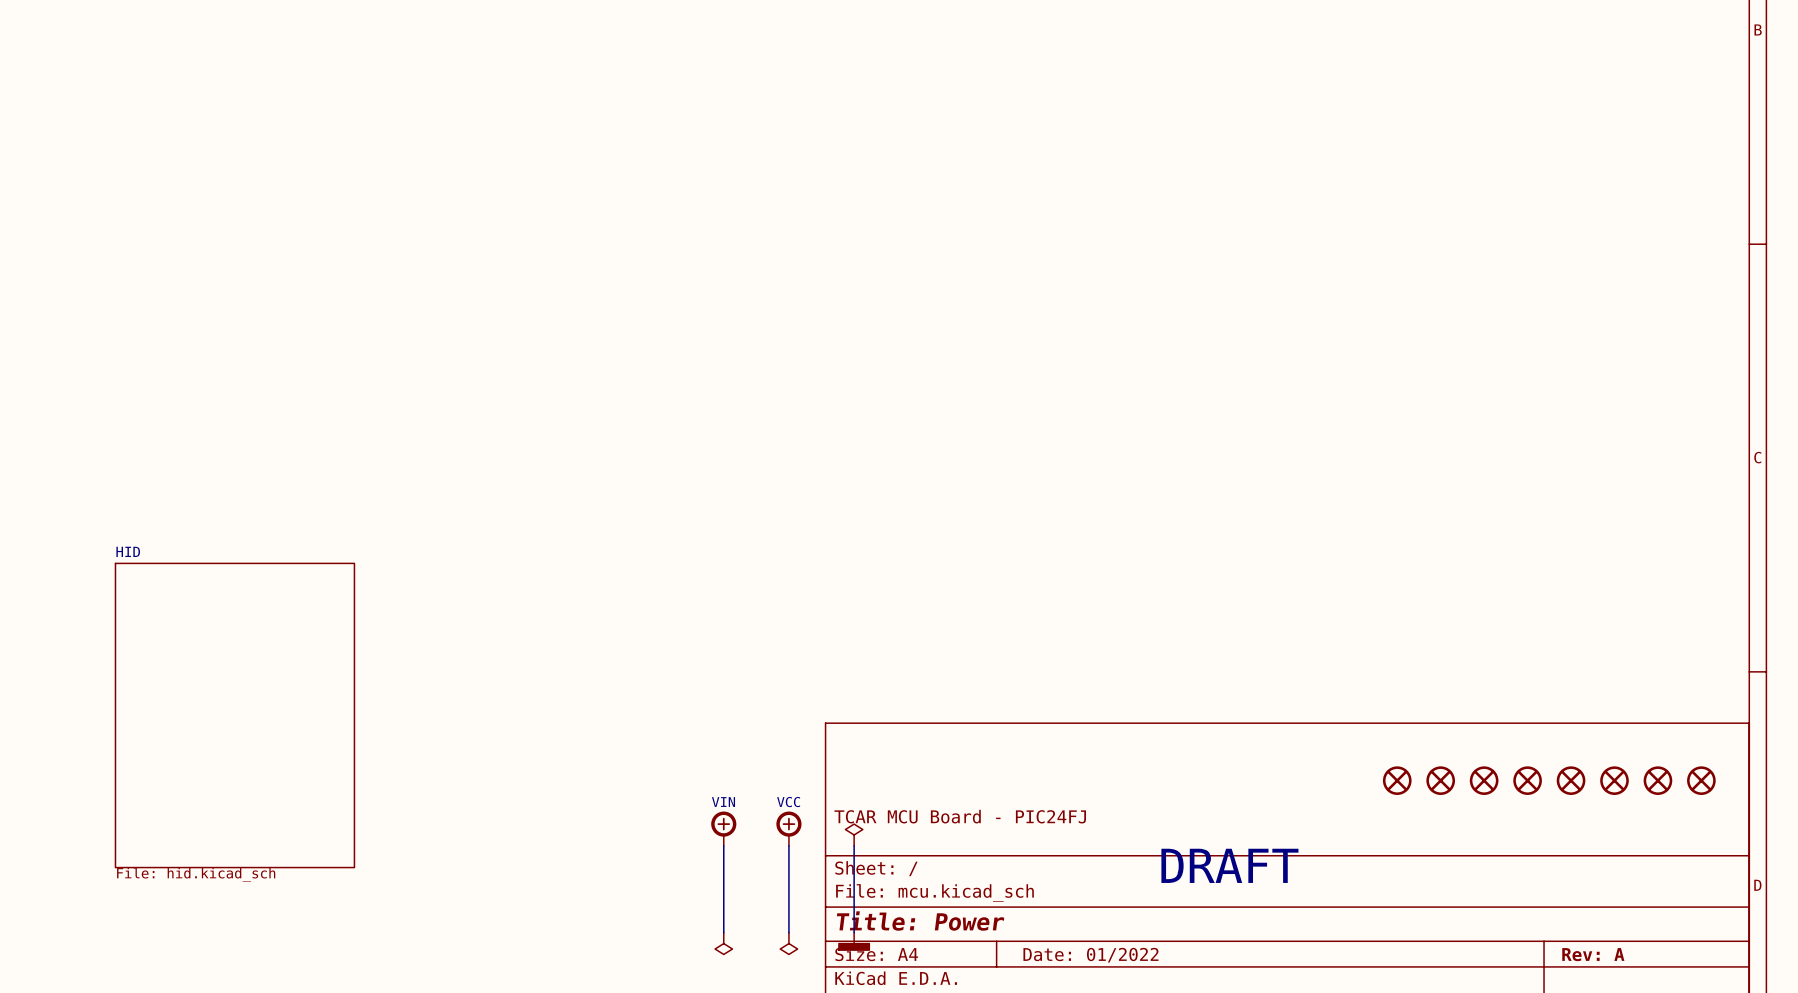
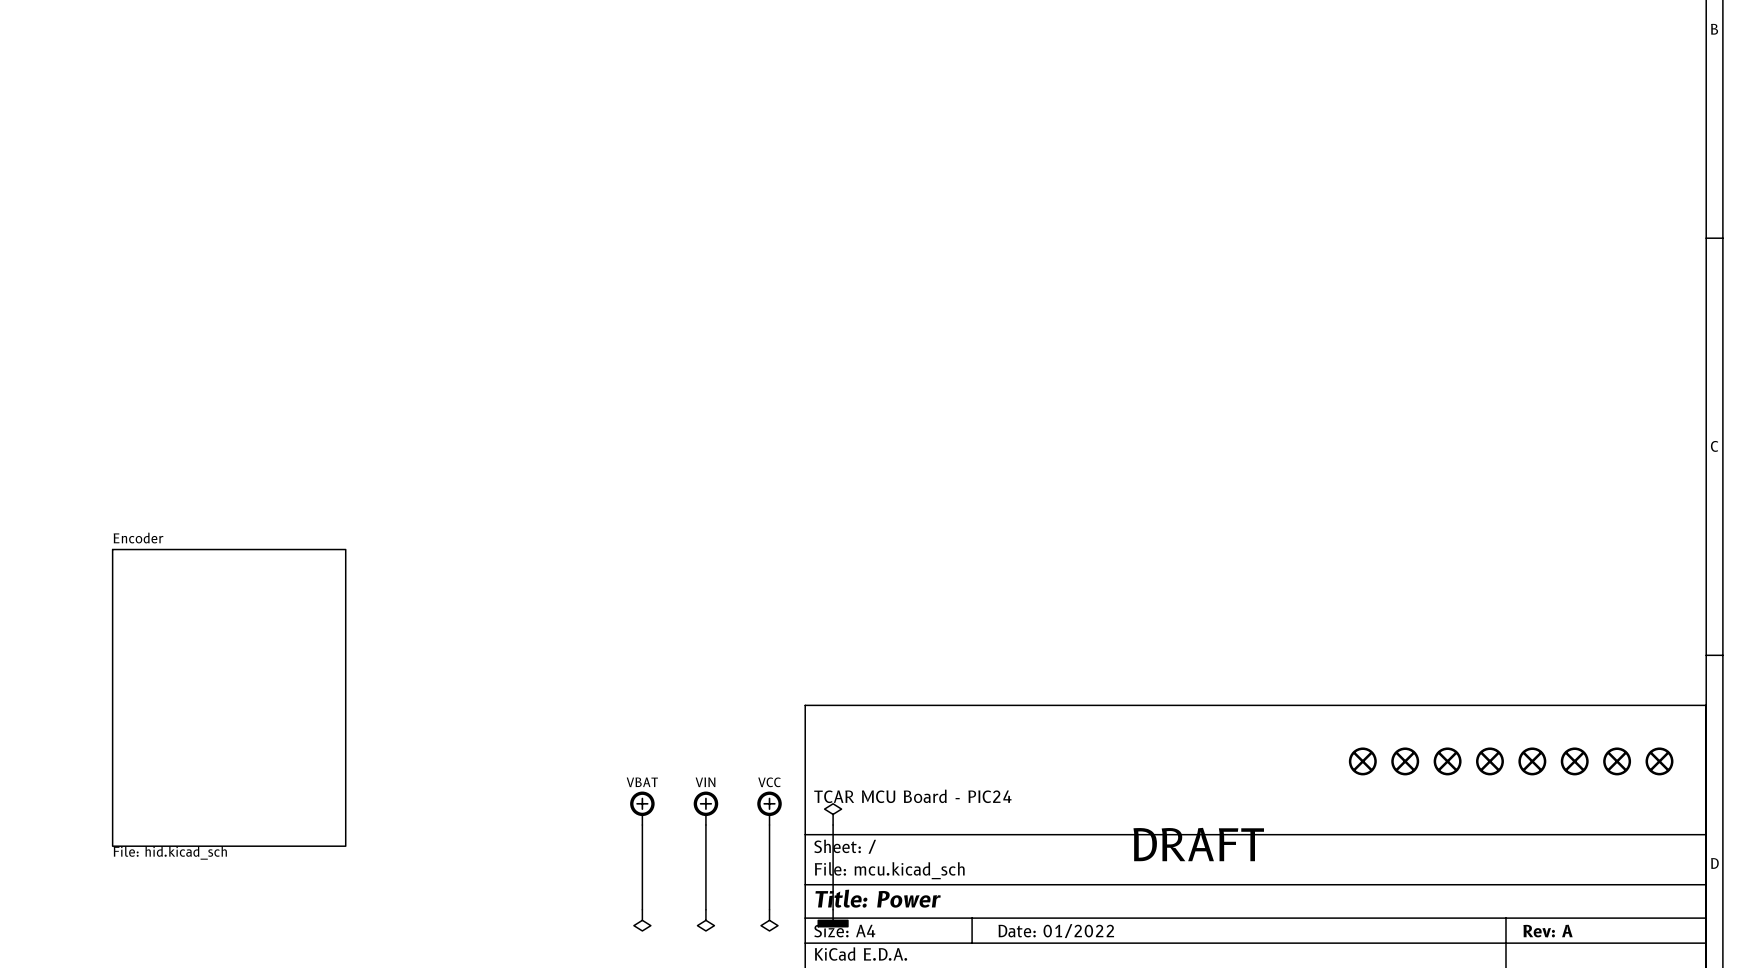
sheet HID name: HID (128, 551) -> Encoder (138, 538)
title block: TCAR MCU Board - PIC24FJ (960, 816) -> TCAR MCU Board - PIC24 (912, 796)
power symbol: none -> (642, 808)
wire: none -> (642, 825) (642, 909)
power symbol: none -> (642, 920)

